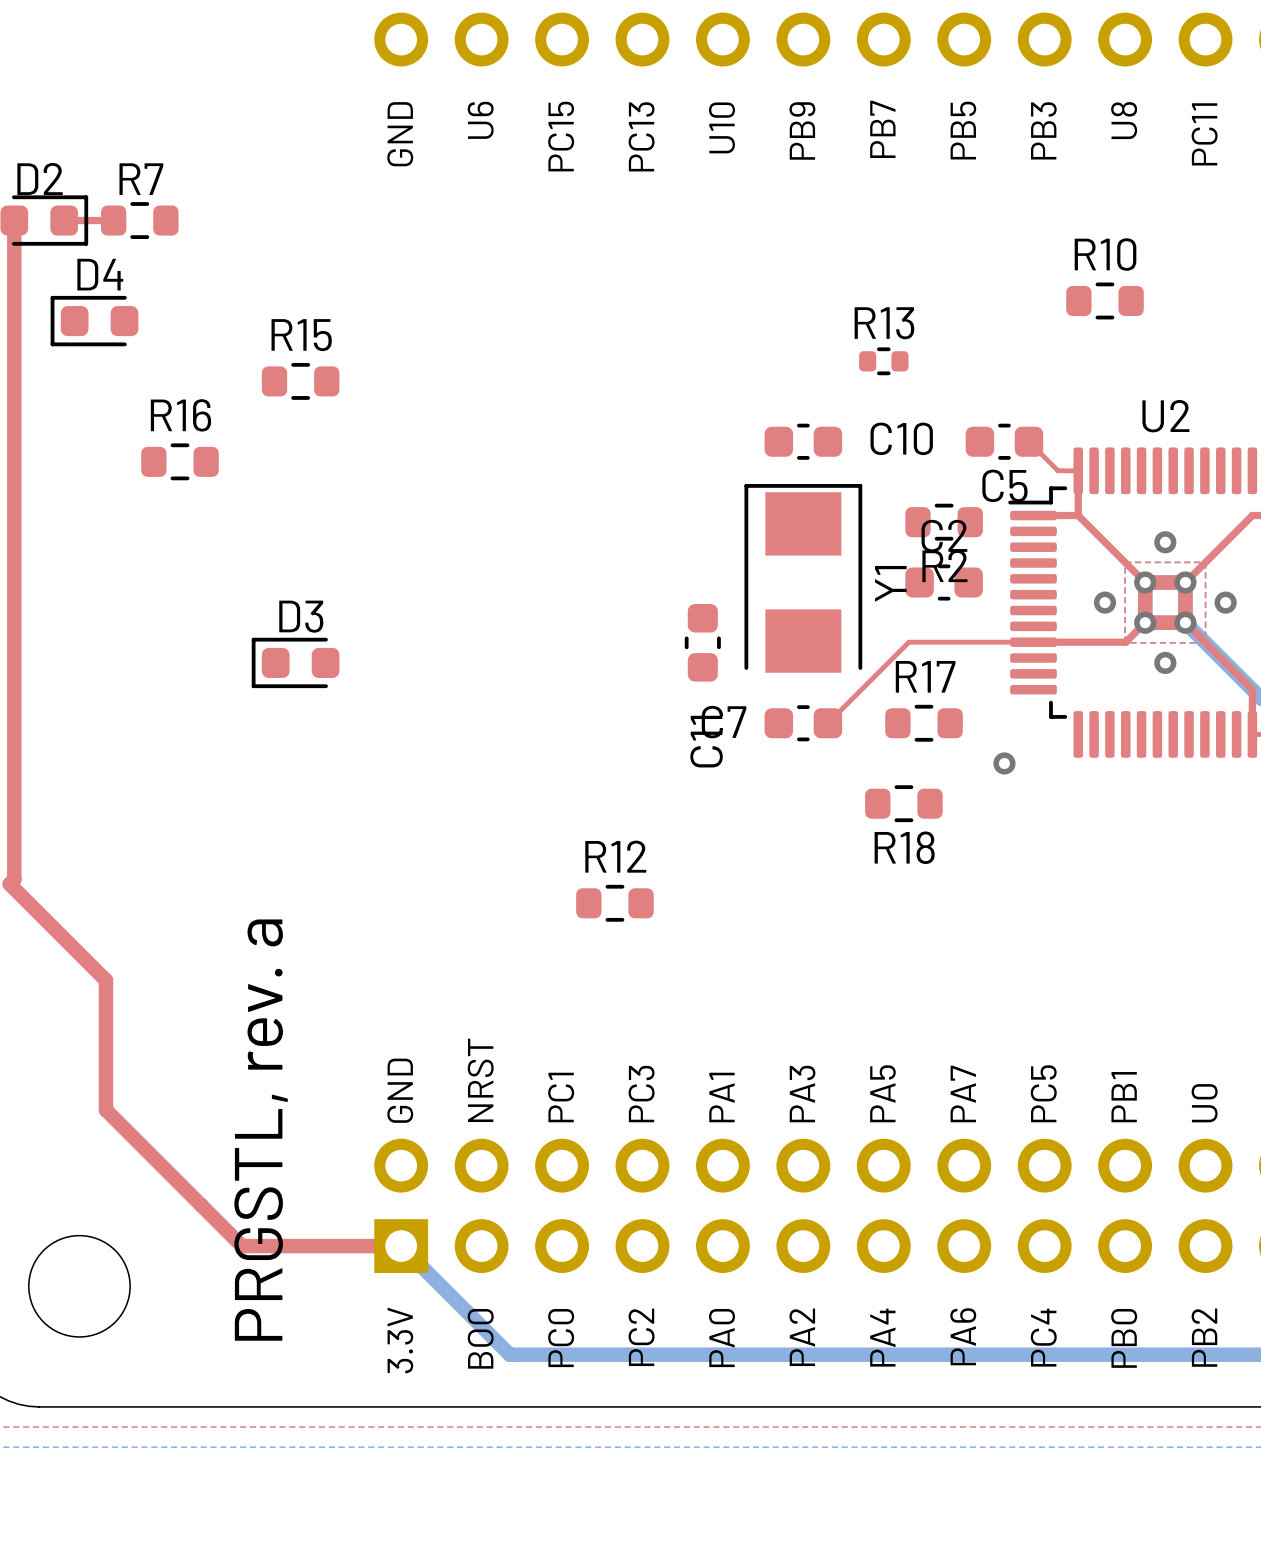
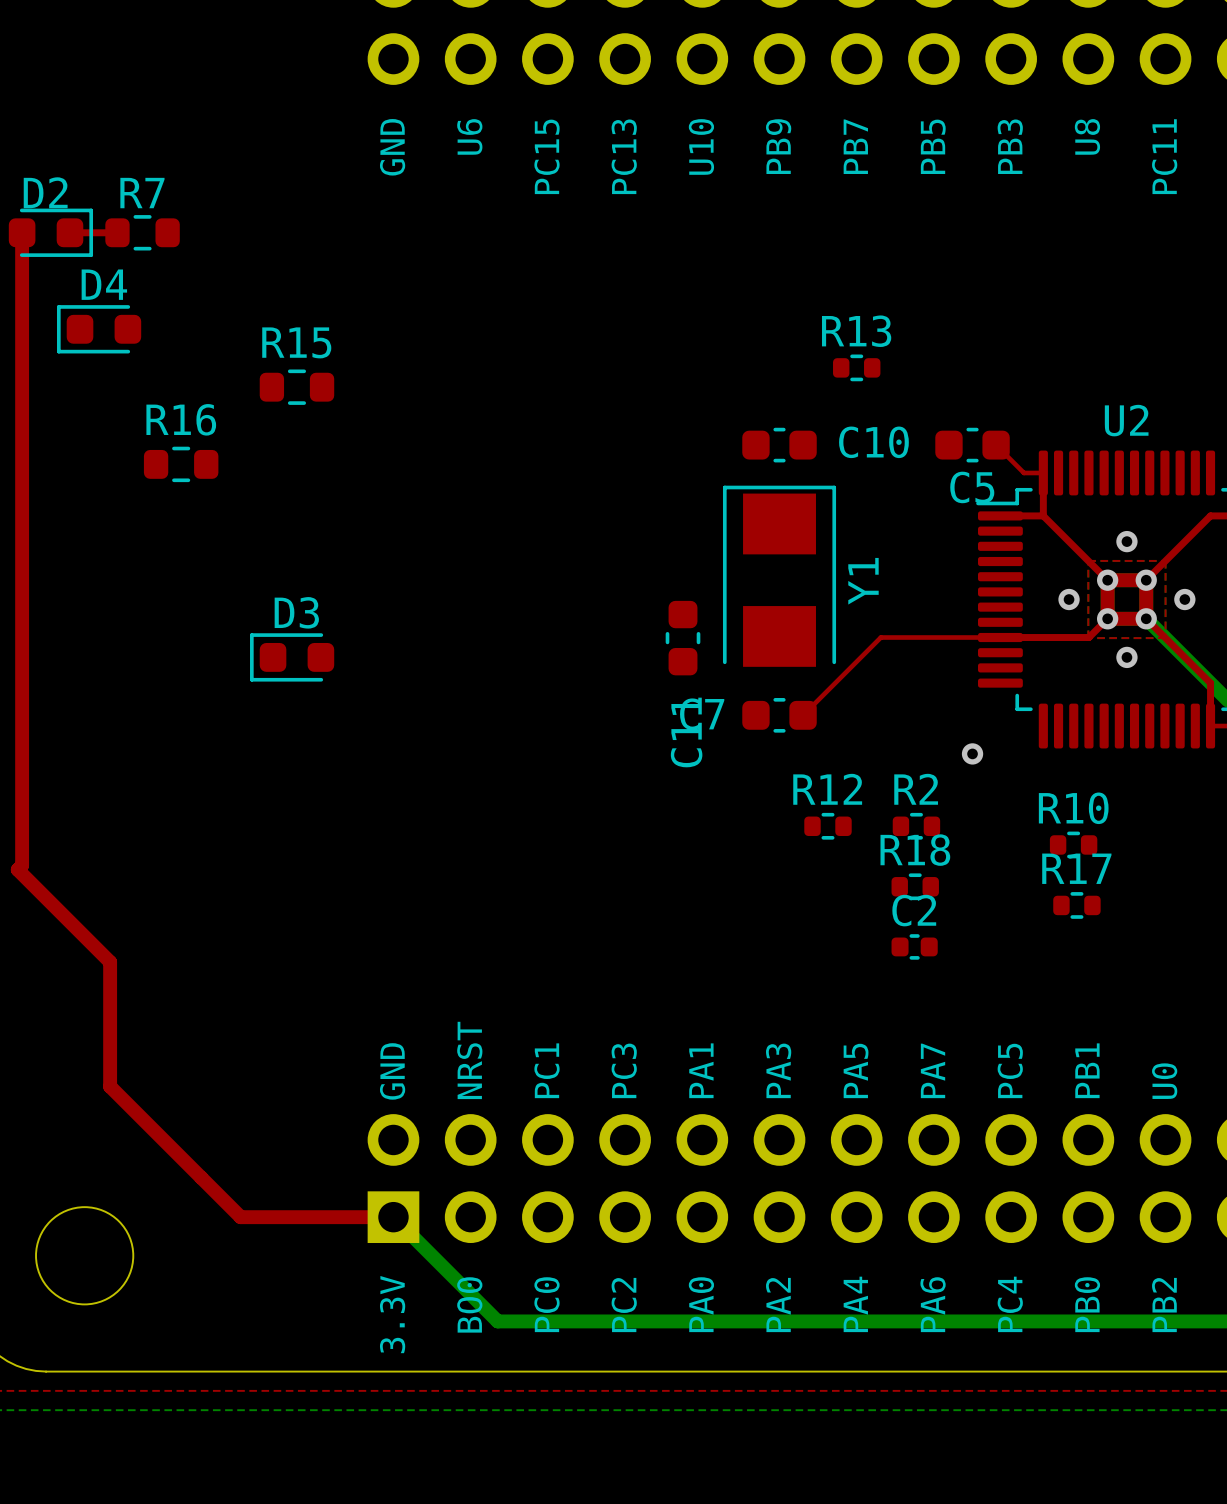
R10 footprint: [1066, 282, 1144, 320] -> [1049, 831, 1098, 859]
R2 footprint: [905, 503, 983, 541] -> [892, 812, 941, 840]
C2 footprint: [905, 564, 983, 601] -> [891, 934, 938, 960]
R2 name position: R2 (944, 566) -> R2 (916, 789)
R17 footprint: [885, 704, 963, 742] -> [1053, 892, 1101, 919]
R18 footprint: [865, 785, 943, 823] -> [891, 873, 939, 901]
R18 name position: R18 (904, 847) -> R18 (915, 850)
R12 footprint: [576, 884, 654, 922] -> [804, 812, 852, 840]
text: PRGSTL, rev. a (261, 1130) -> none

